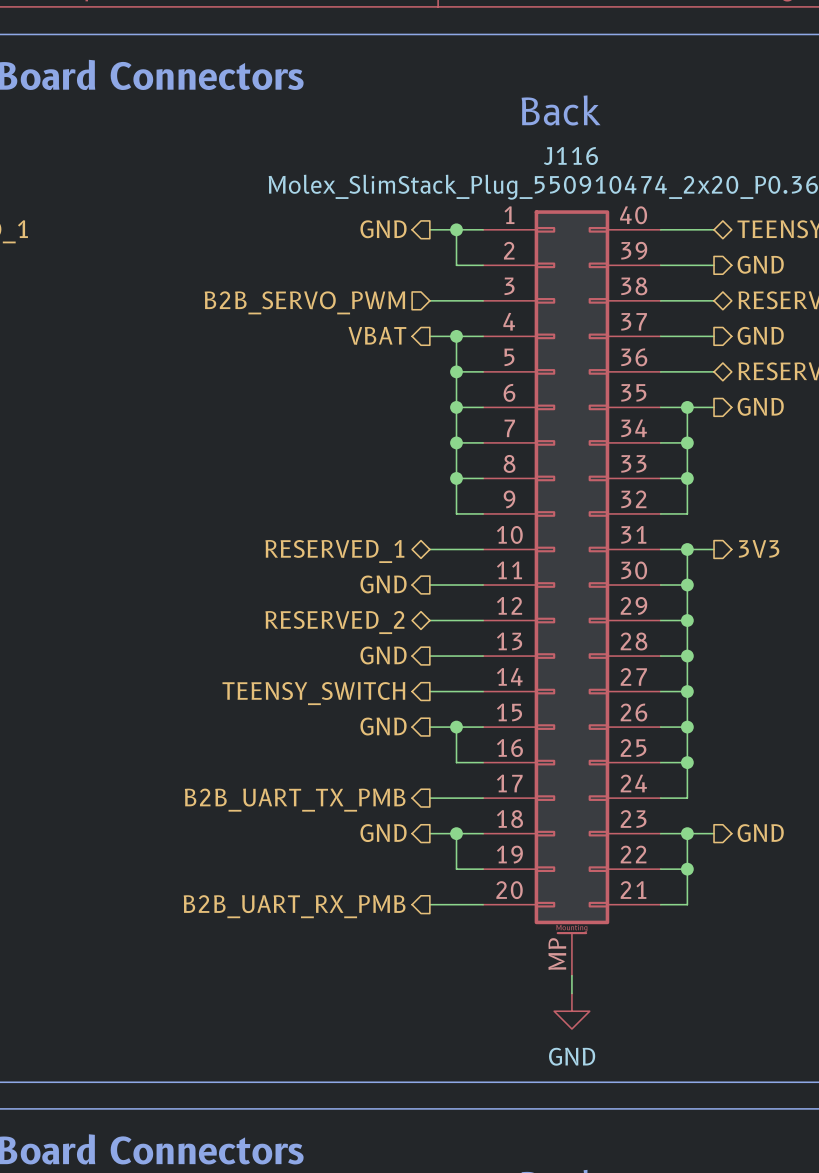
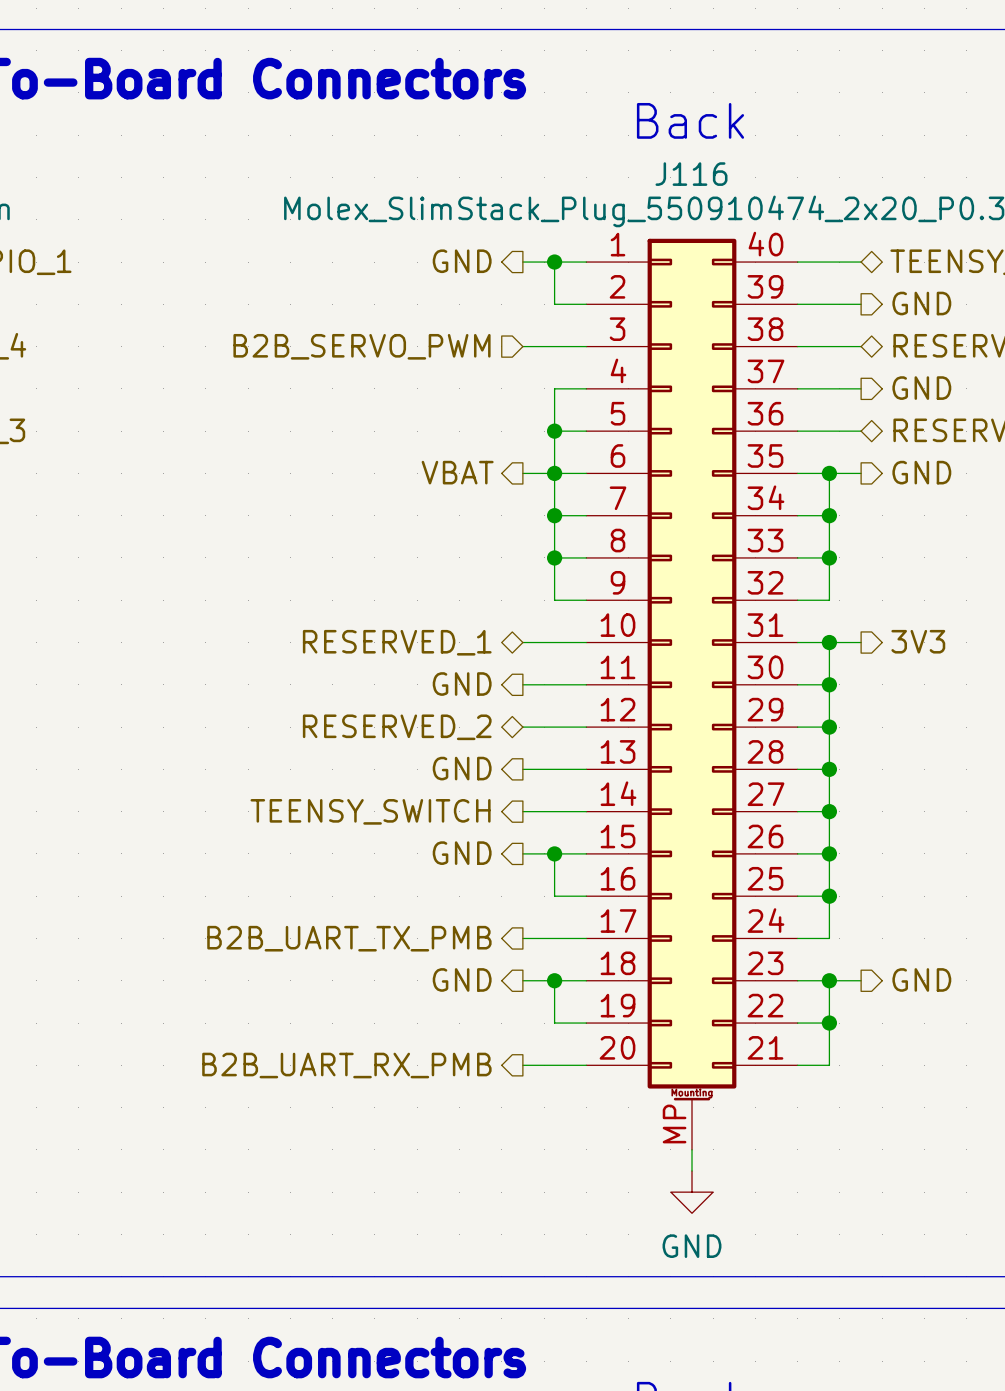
hierarchical label position: VBAT (377, 335) -> VBAT (457, 472)
wire: (429, 336) (456, 336) -> (522, 473) (554, 473)
junction: (456, 336) -> none

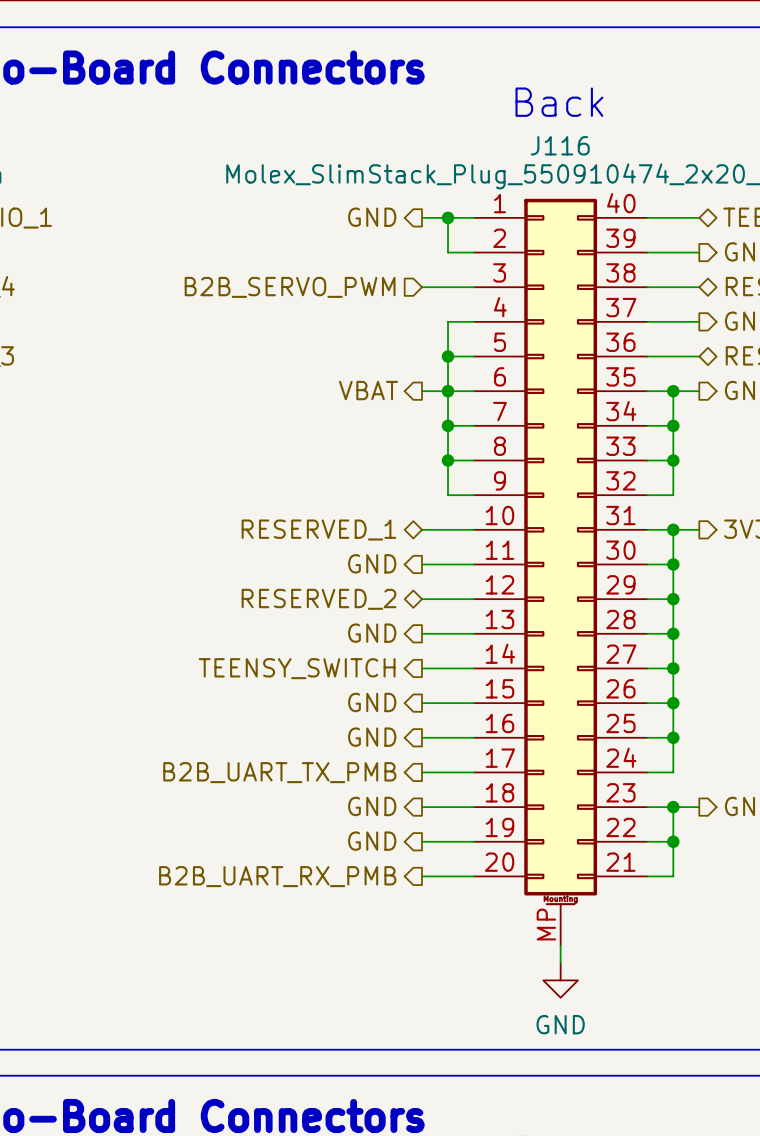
wire: (554, 853) (554, 896) -> (422, 737) (448, 737)
junction: (554, 853) -> none
hierarchical label: none -> GND (372, 737)
wire: (554, 980) (554, 1023) -> (422, 841) (448, 841)
junction: (554, 980) -> none
hierarchical label: none -> GND (372, 841)

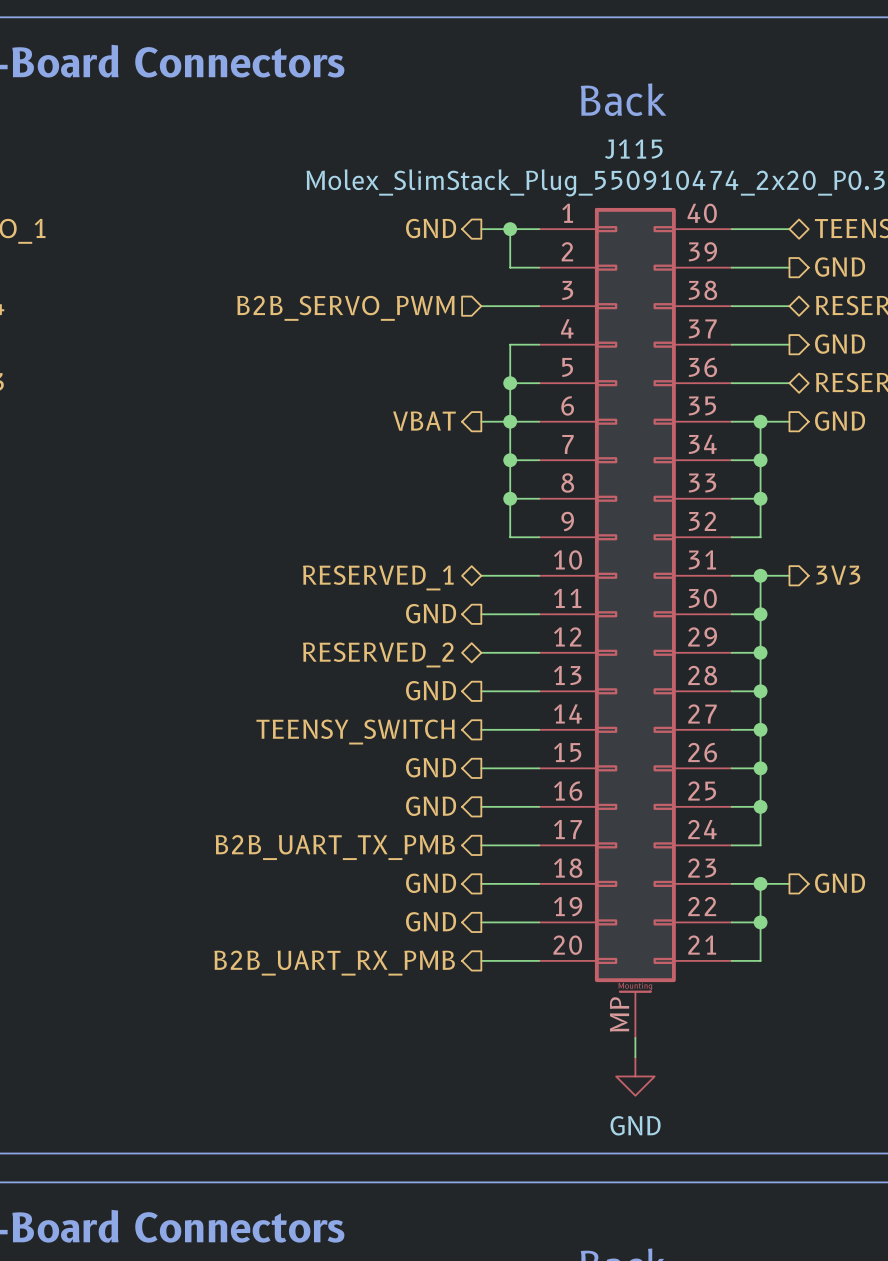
J116 name: J116 (560, 145) -> J115 (633, 149)

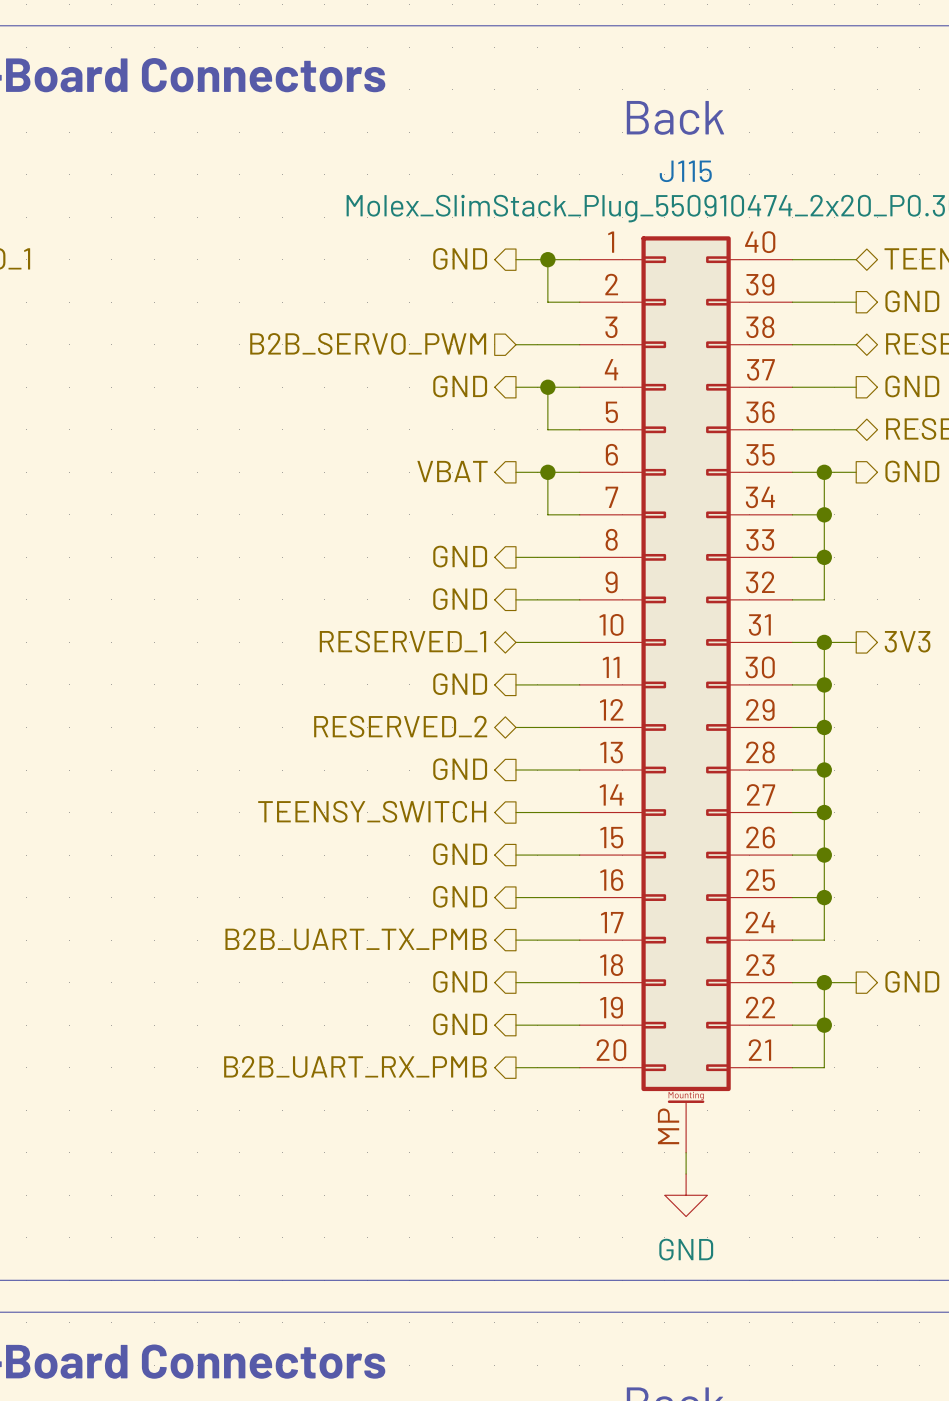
hierarchical label: none -> GND (460, 386)
wire: none -> (515, 387) (547, 387)
wire: (510, 383) (510, 421) -> none
junction position: (510, 383) -> (547, 387)
wire: (510, 460) (510, 537) -> (515, 599) (547, 599)
junction: (510, 460) -> none
hierarchical label: none -> GND (460, 556)
wire: none -> (515, 557) (547, 557)
junction: (510, 498) -> none
hierarchical label: none -> GND (460, 599)

